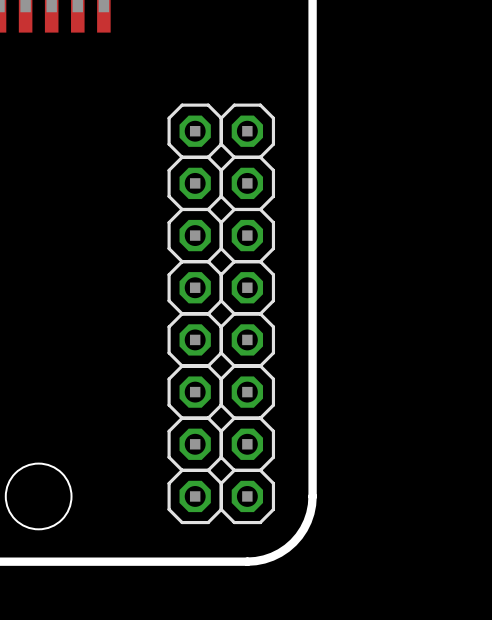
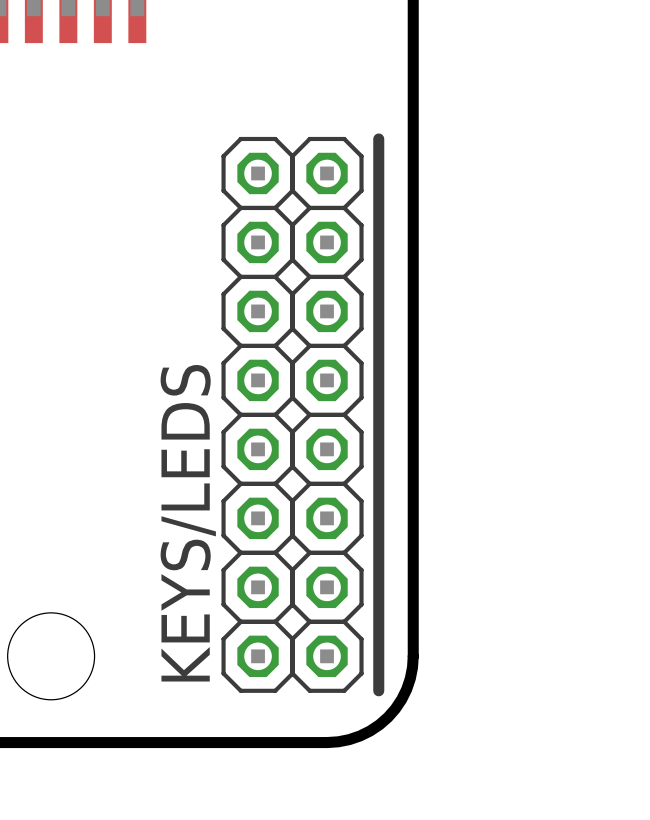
line: none -> (378, 138) (378, 690)
text: none -> KEYS/LEDS (188, 523)

